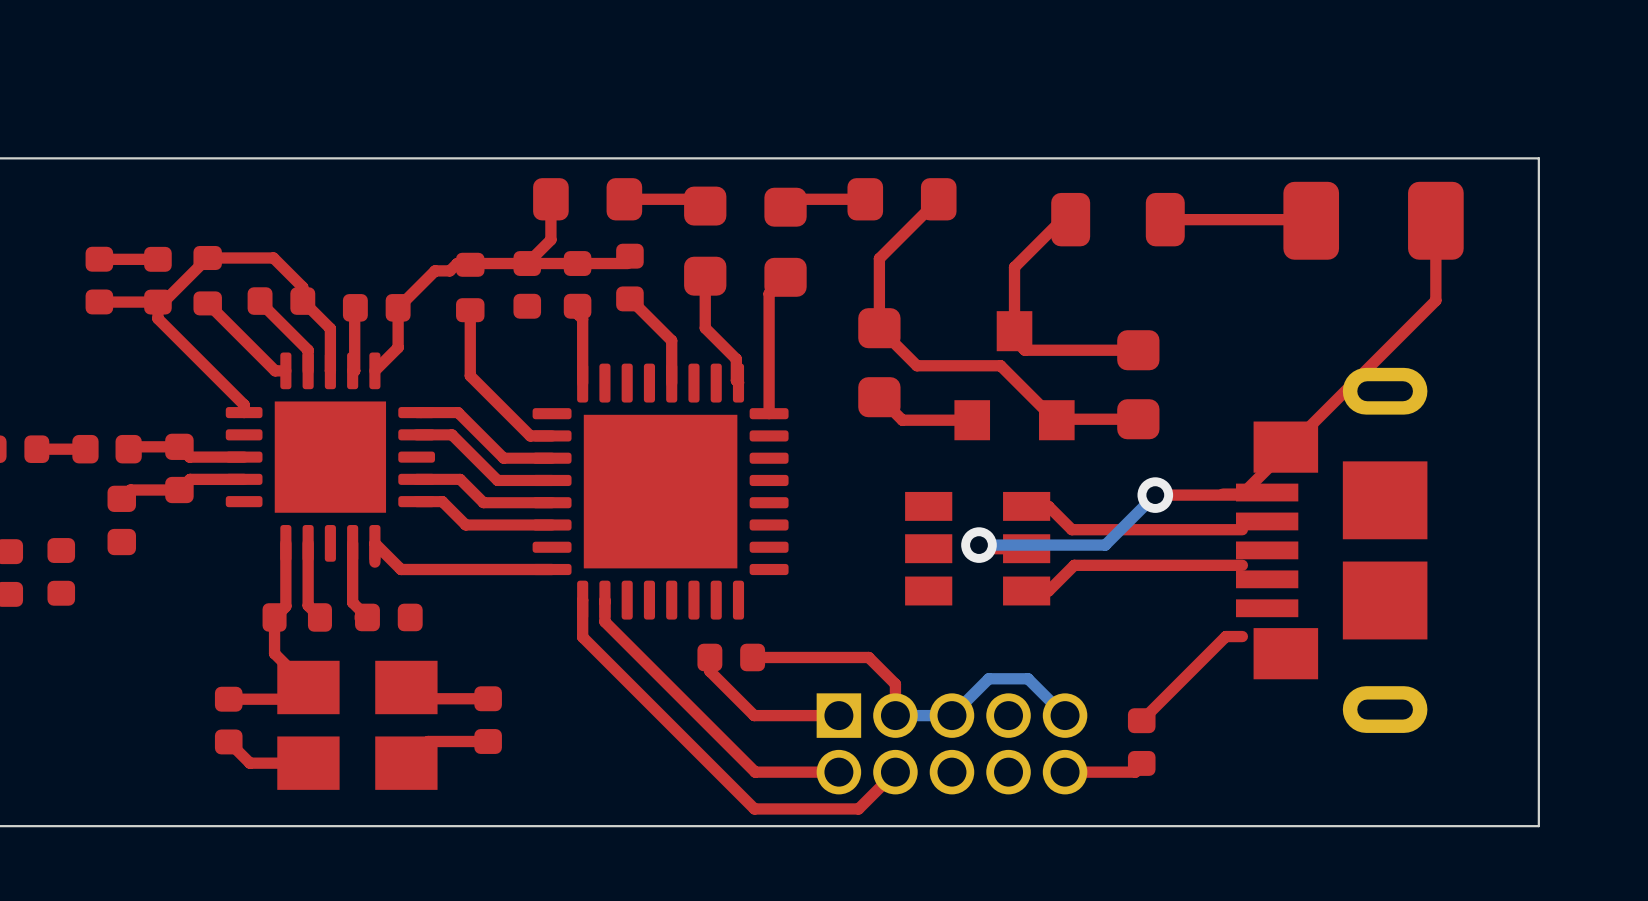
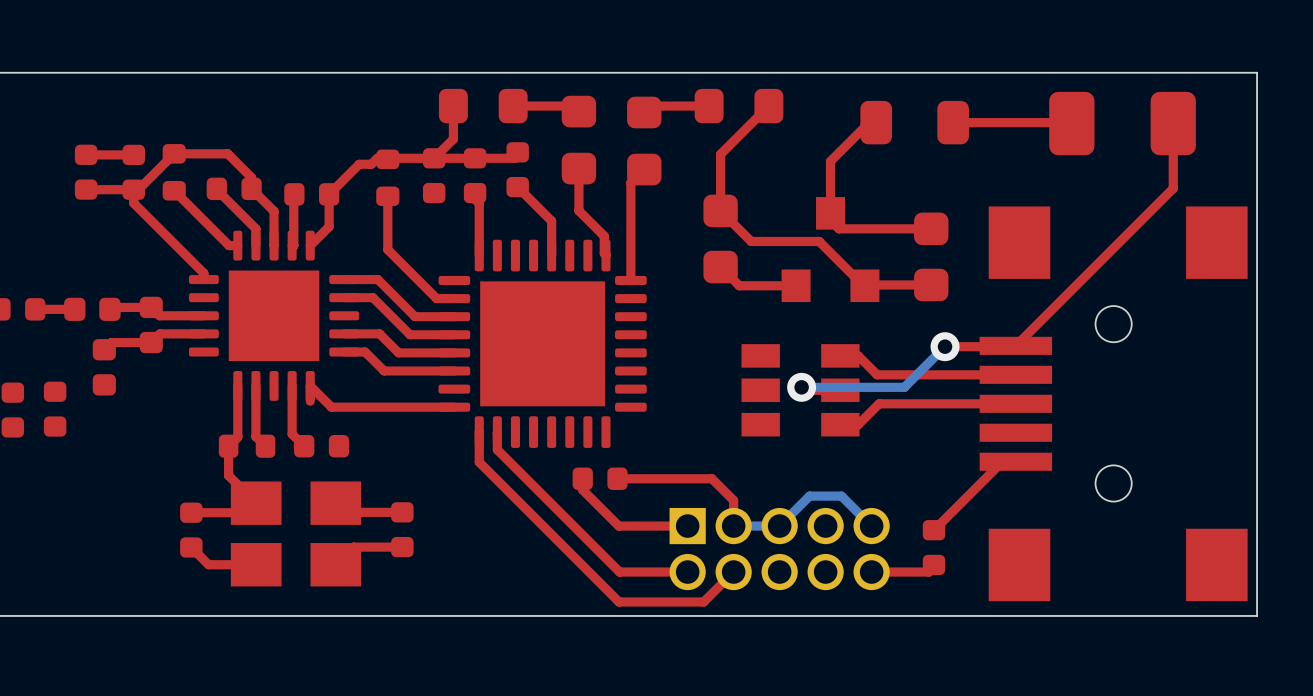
part footprint: [1235, 367, 1428, 733] -> [979, 206, 1248, 602]

